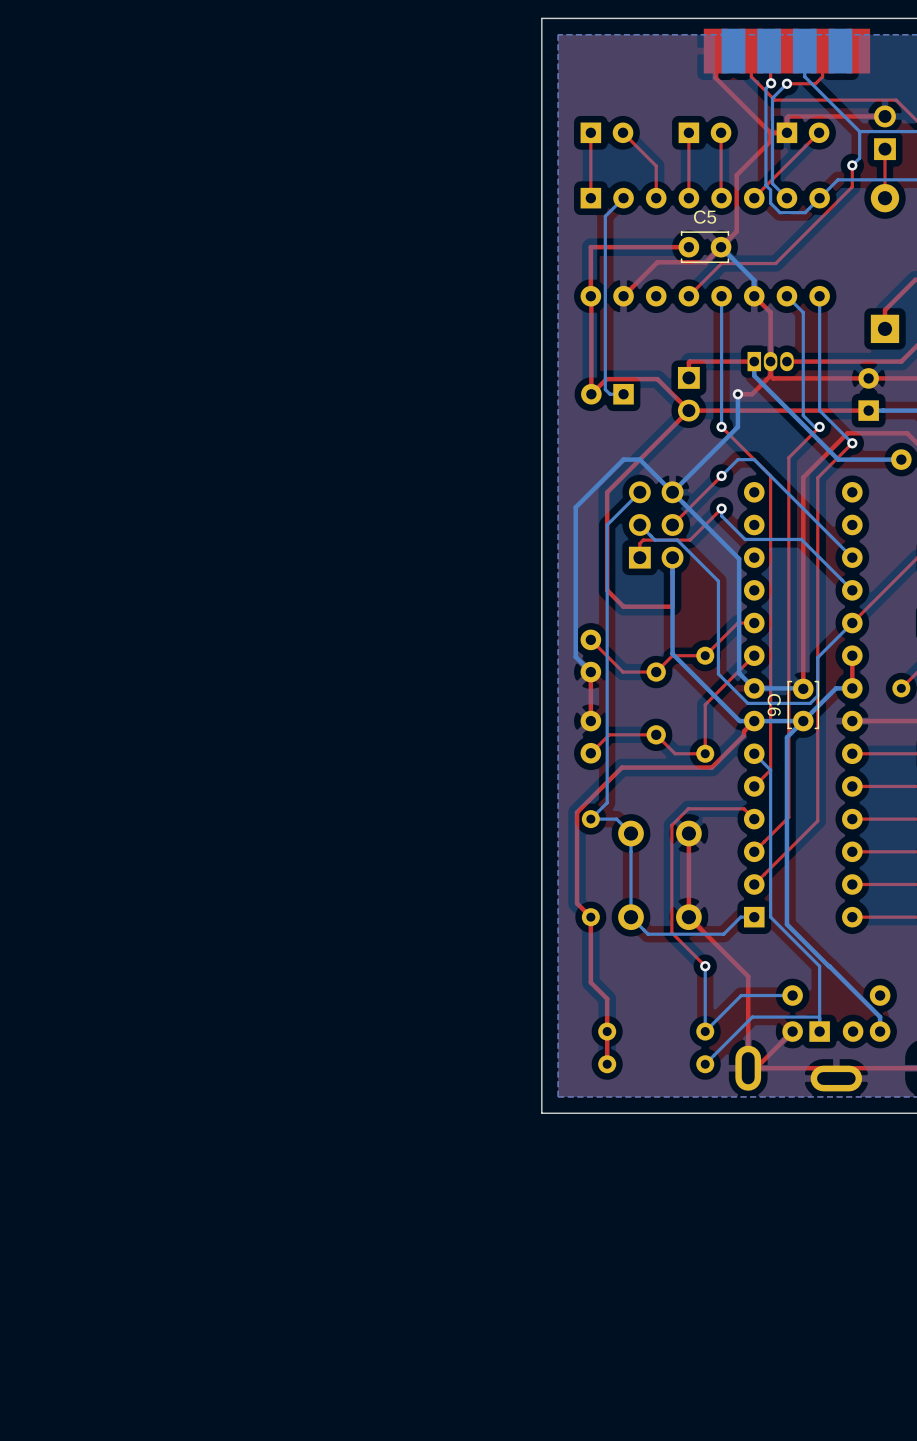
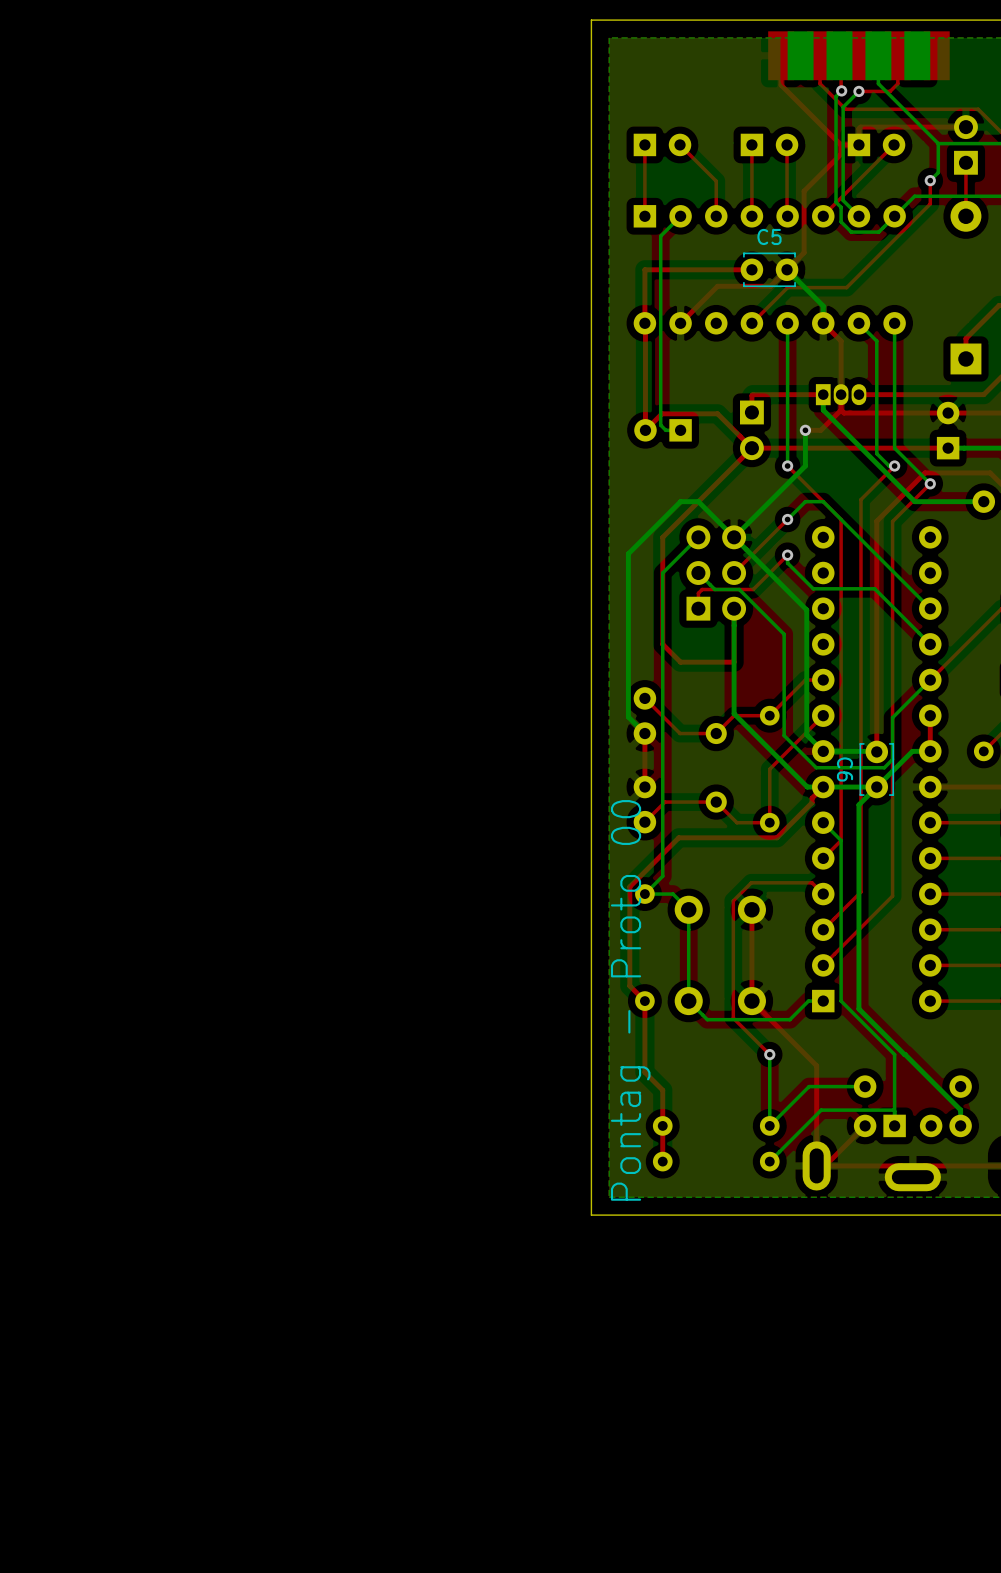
text: none -> Pontag - Proto 00 (630, 1000)

